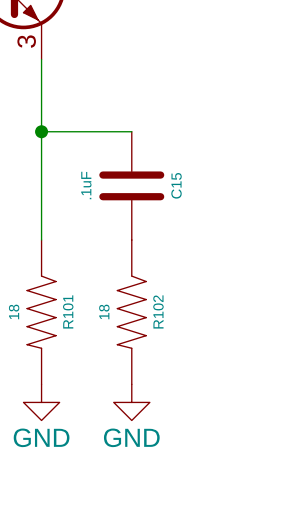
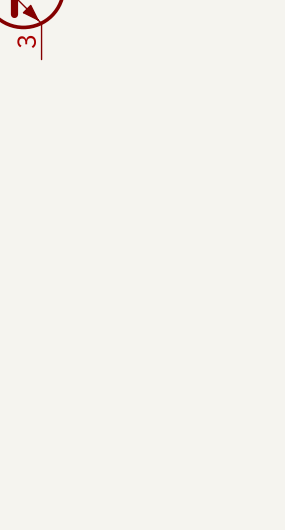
wire: (41, 59) (41, 240) -> none
wire: (41, 131) (131, 131) -> none
junction: (41, 131) -> none
C15: .1uF (131, 185) -> none
R101: 18 (41, 312) -> none
R102: 18 (131, 312) -> none
power symbol: GND (41, 402) -> none
power symbol: GND (131, 402) -> none

